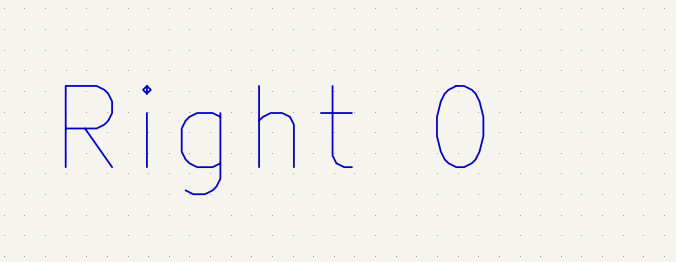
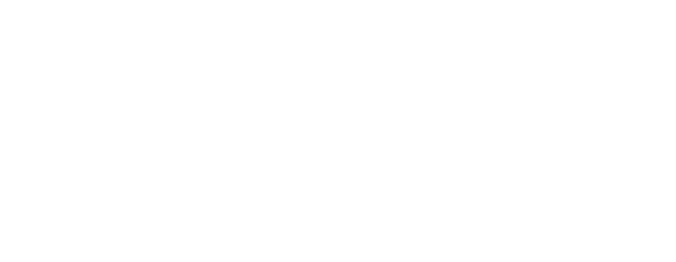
text: Right 0 (274, 140) -> none

